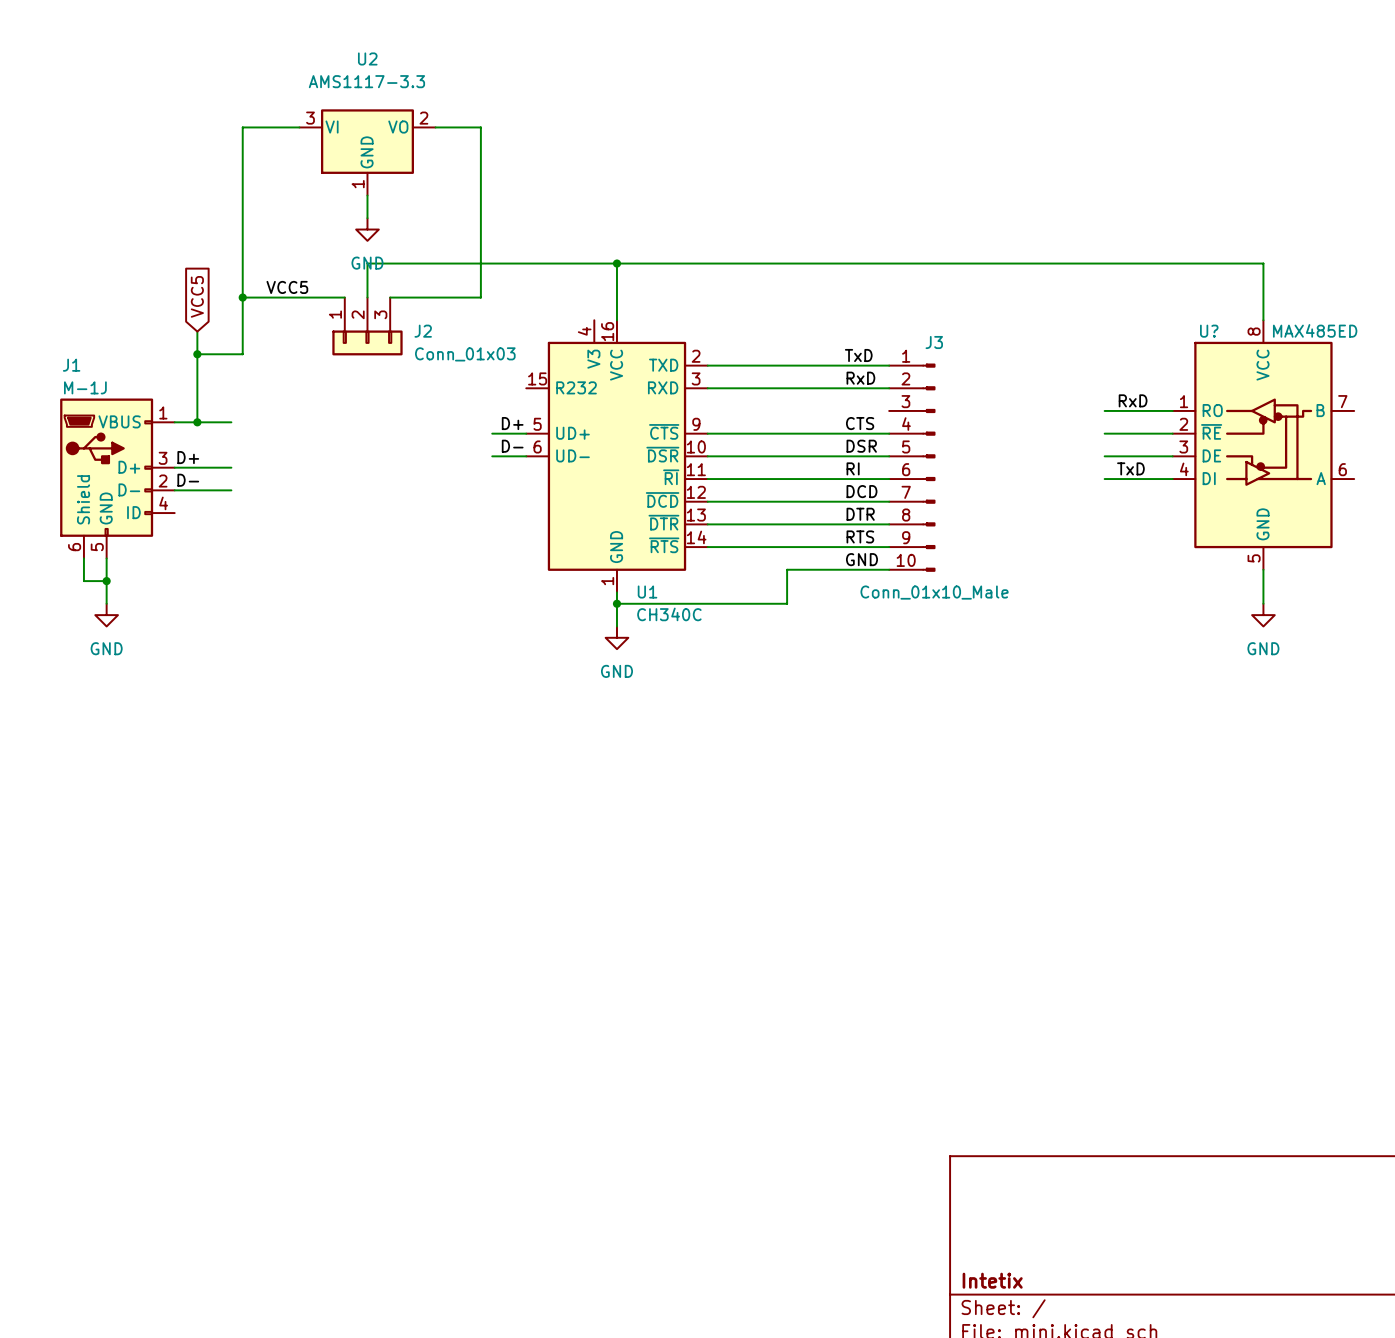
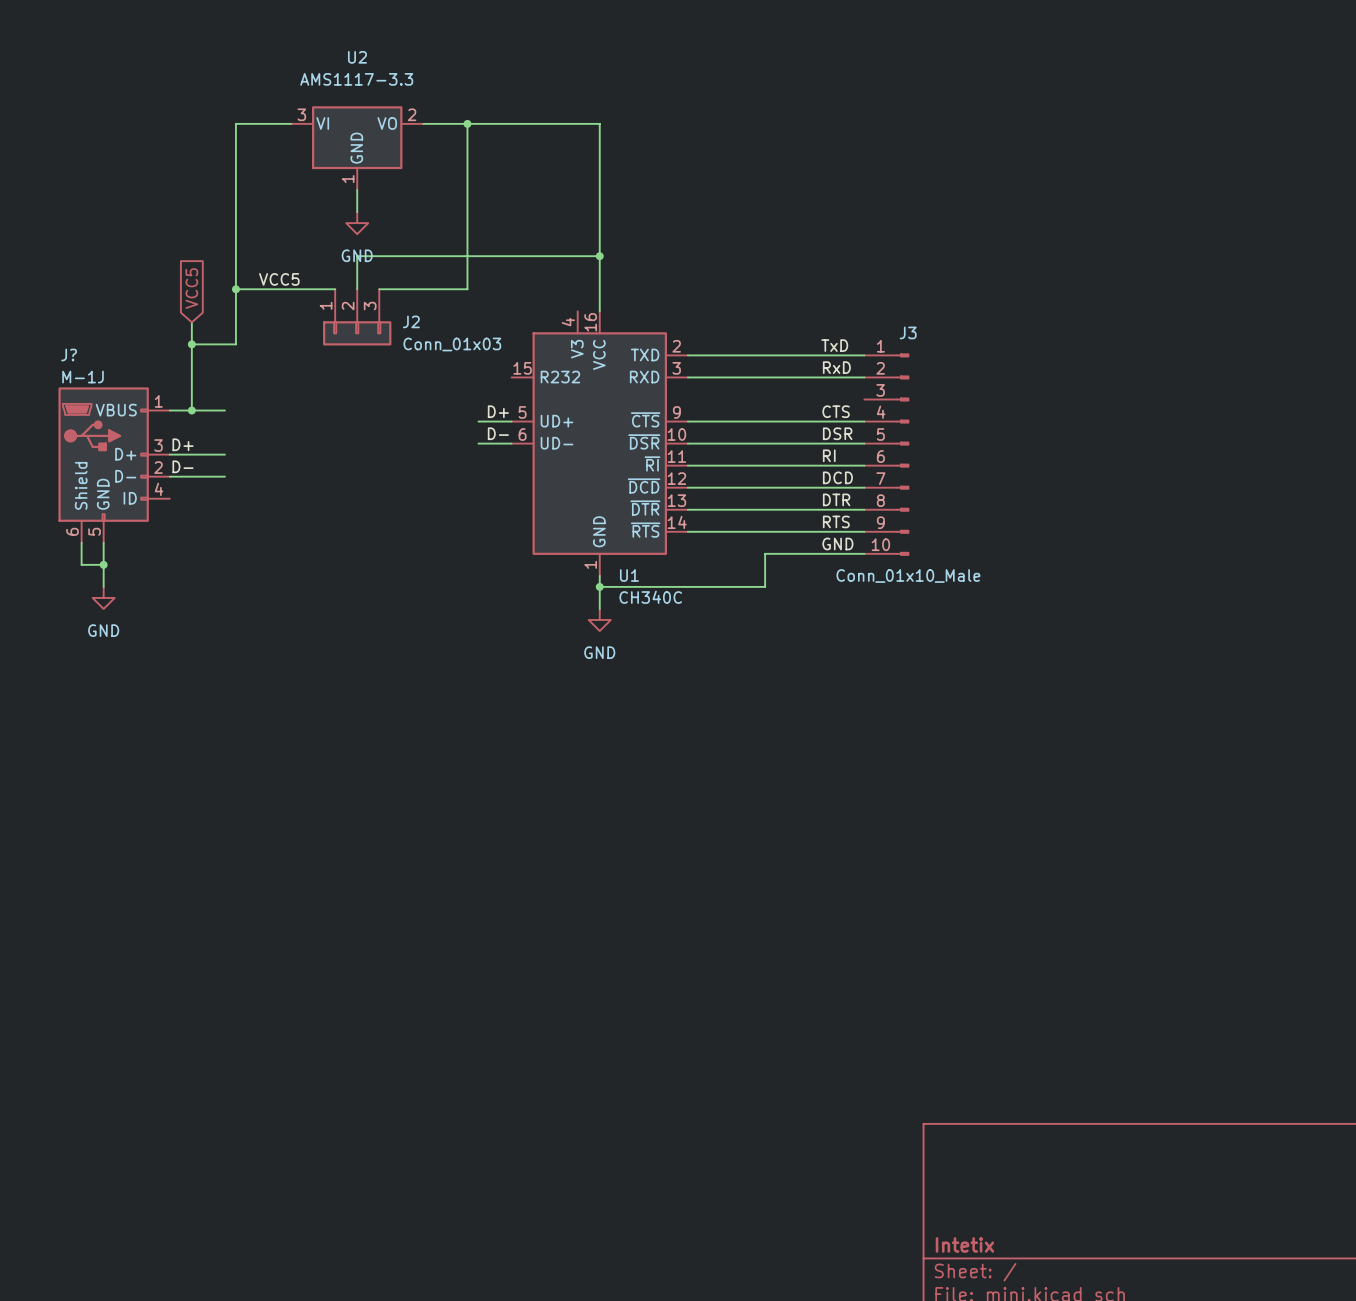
junction: none -> (467, 123)
wire: (616, 263) (1263, 263) (1263, 320) -> (599, 256) (599, 123) (467, 123)
J1 name: J1 (71, 365) -> J? (69, 354)
label: RxD (1133, 400) -> none
wire: (1104, 410) (1172, 410) -> none
wire: (1104, 433) (1172, 433) -> none
U?: MAX485ED (1263, 445) -> none
wire: (1104, 456) (1172, 456) -> none
label: TxD (1130, 468) -> none
wire: (1104, 479) (1172, 479) -> none
wire: (1263, 569) (1263, 603) -> none
power symbol: GND (1263, 615) -> none

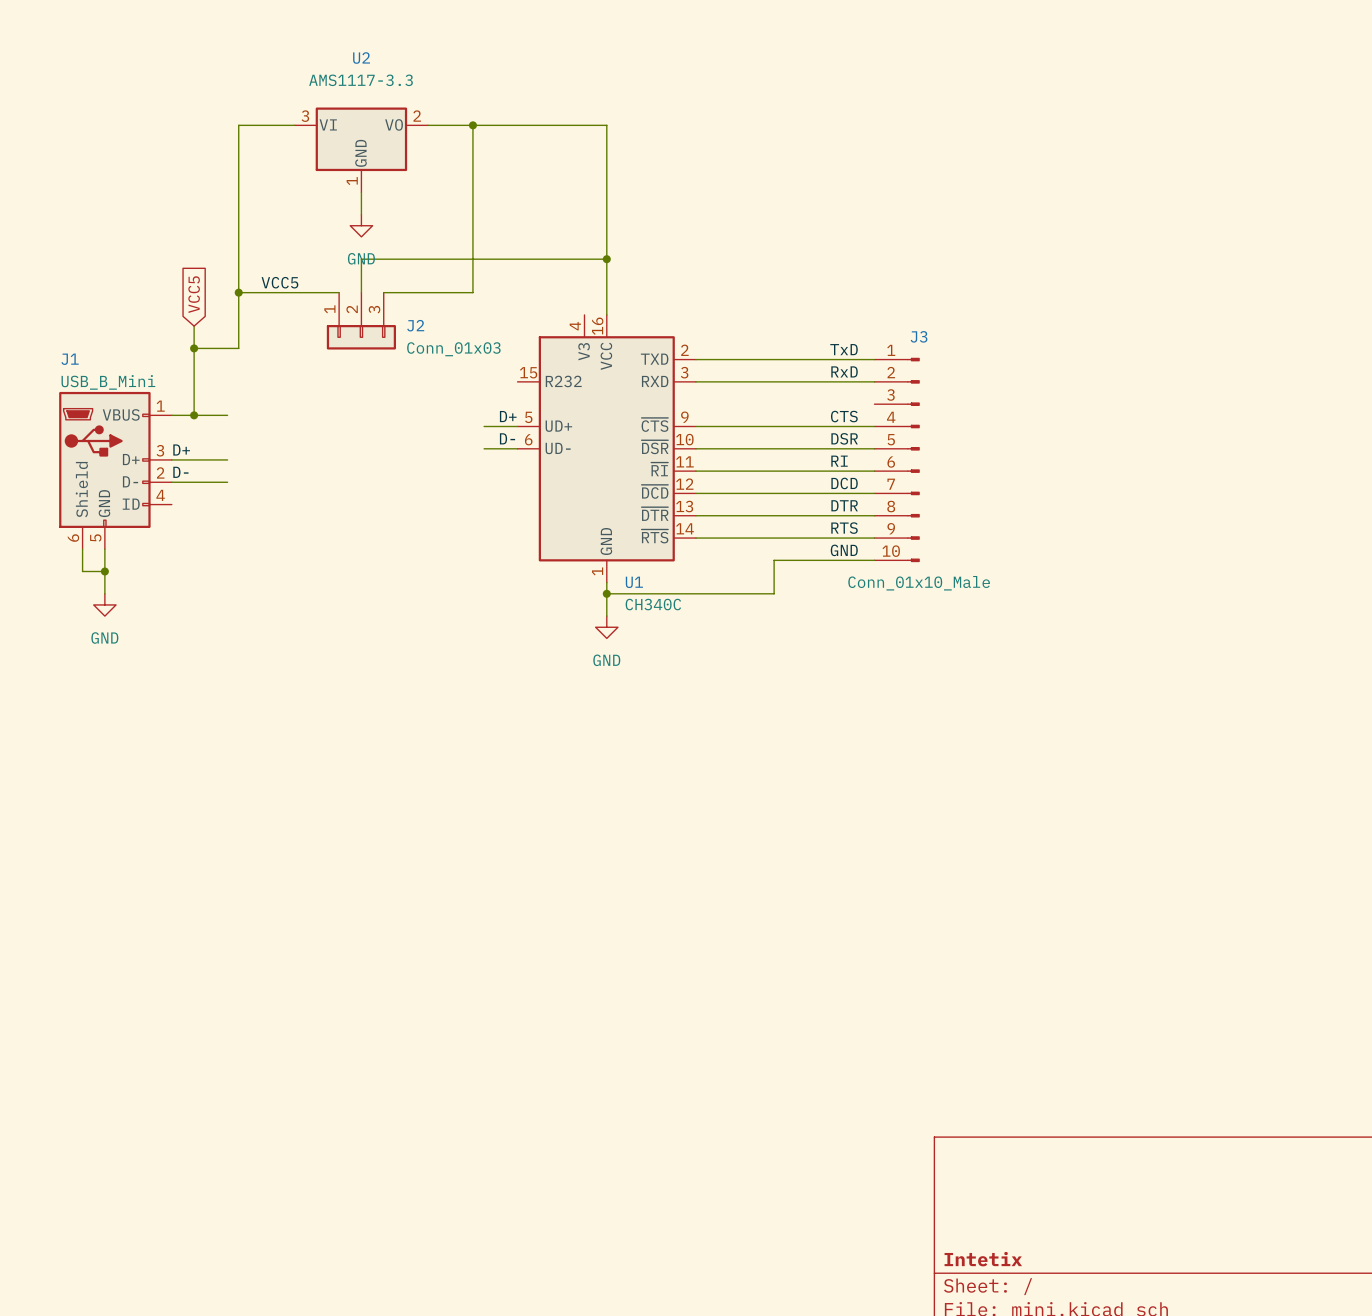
J? name: J? (69, 354) -> J1 (70, 359)
J? value: M-1J (83, 377) -> USB_B_Mini (108, 382)

